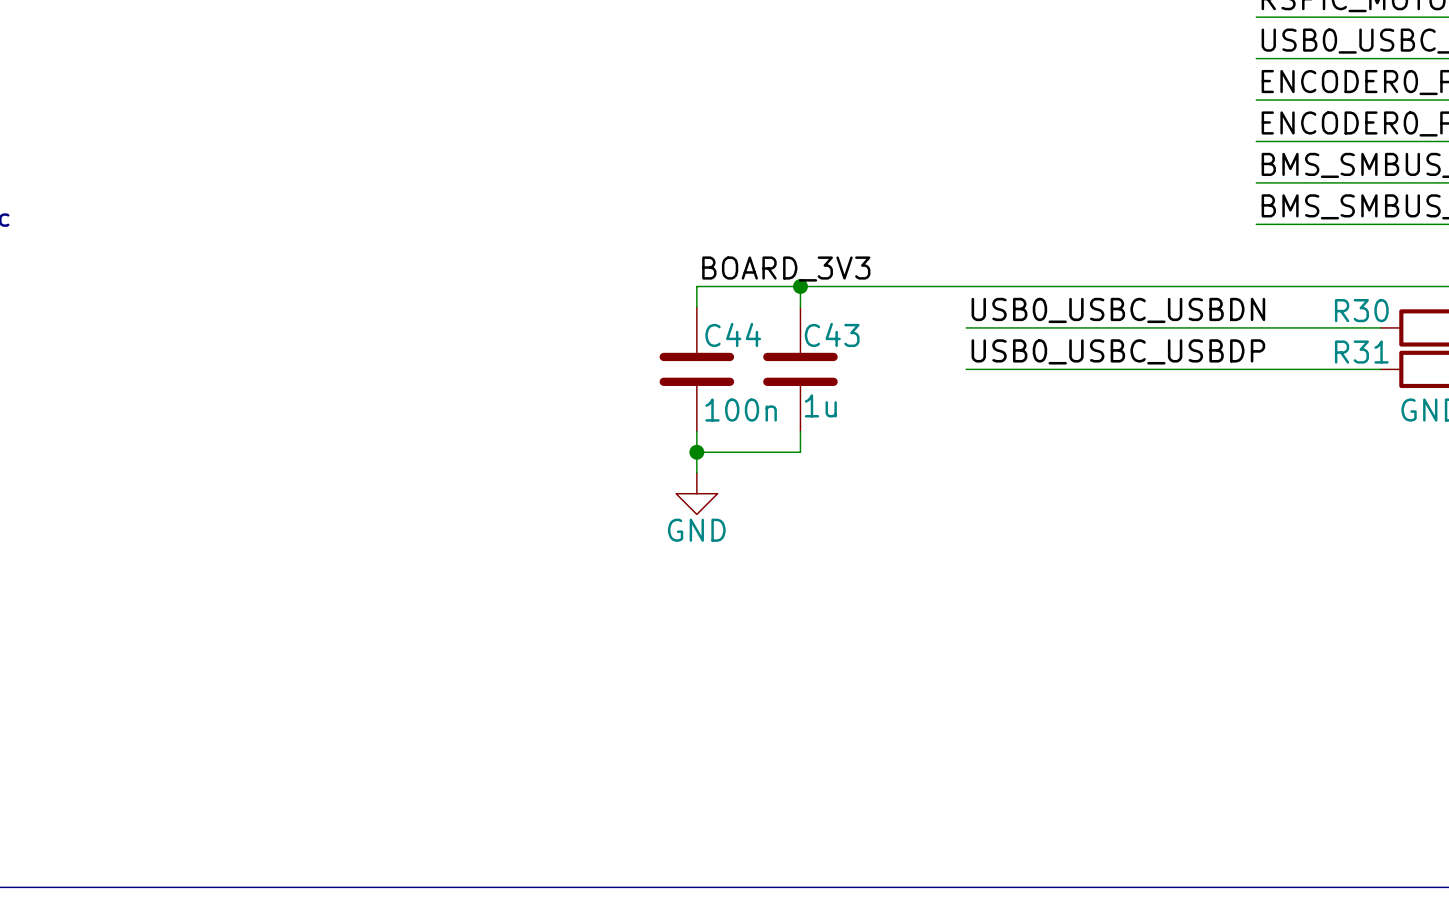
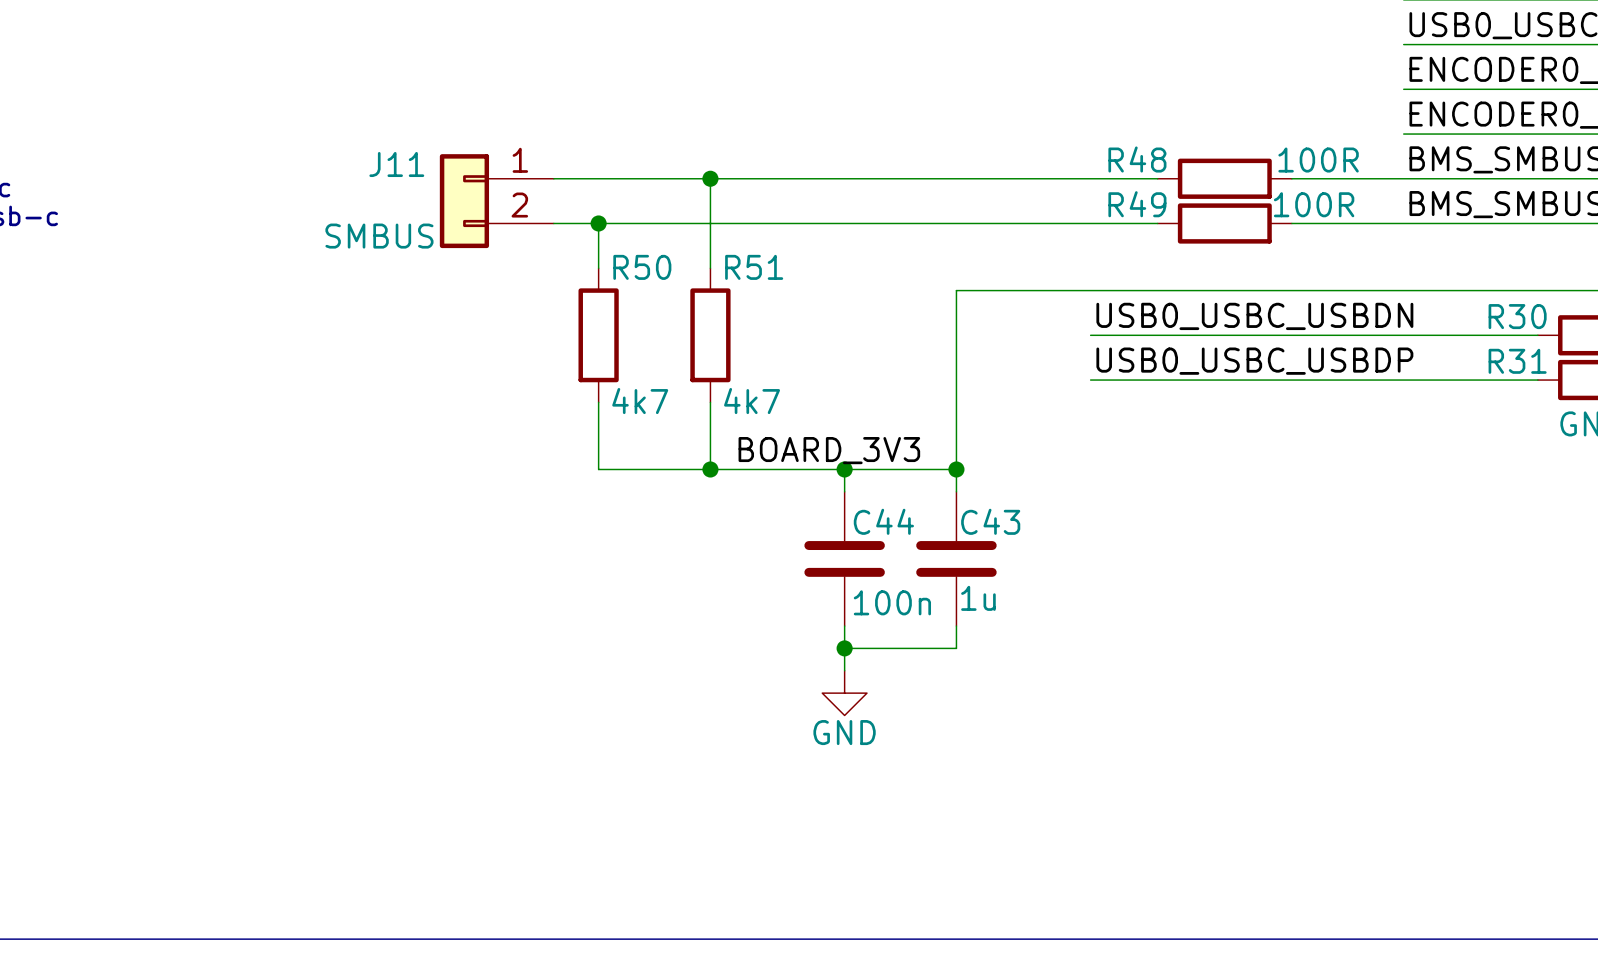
wire: none -> (553, 178) (1157, 178)
wire: none -> (710, 178) (710, 268)
junction: none -> (710, 178)
R48: none -> 100R (1224, 178)
wire: none -> (1291, 178) (1403, 178)
J11: none -> SMBUS (496, 201)
wire: none -> (553, 223) (1157, 223)
wire: none -> (598, 223) (598, 268)
junction: none -> (598, 223)
R49: none -> 100R (1224, 223)
wire: none -> (1291, 223) (1403, 223)
label position: BOARD_3V3 (786, 269) -> BOARD_3V3 (829, 450)
wire: (800, 286) (800, 307) -> (844, 469) (844, 491)
junction: (800, 286) -> none
wire: (841, 286) (696, 286) (696, 307) -> (956, 290) (956, 491)
R50: none -> 4k7 (598, 335)
R51: none -> 4k7 (710, 335)
C44 position: (696, 369) -> (844, 558)
C43 position: (800, 369) -> (956, 558)
wire: none -> (598, 402) (598, 469) (799, 469)
wire: none -> (710, 402) (710, 469)
wire: (696, 431) (696, 472) -> (844, 626) (844, 670)
wire: (800, 431) (800, 452) -> (956, 469) (911, 469)
junction: none -> (710, 469)
junction: (696, 452) -> none
junction: none -> (844, 469)
junction: none -> (956, 469)
power symbol position: GND (696, 493) -> GND (844, 693)
wire: none -> (956, 626) (956, 648) (844, 648)
junction: none -> (844, 648)

